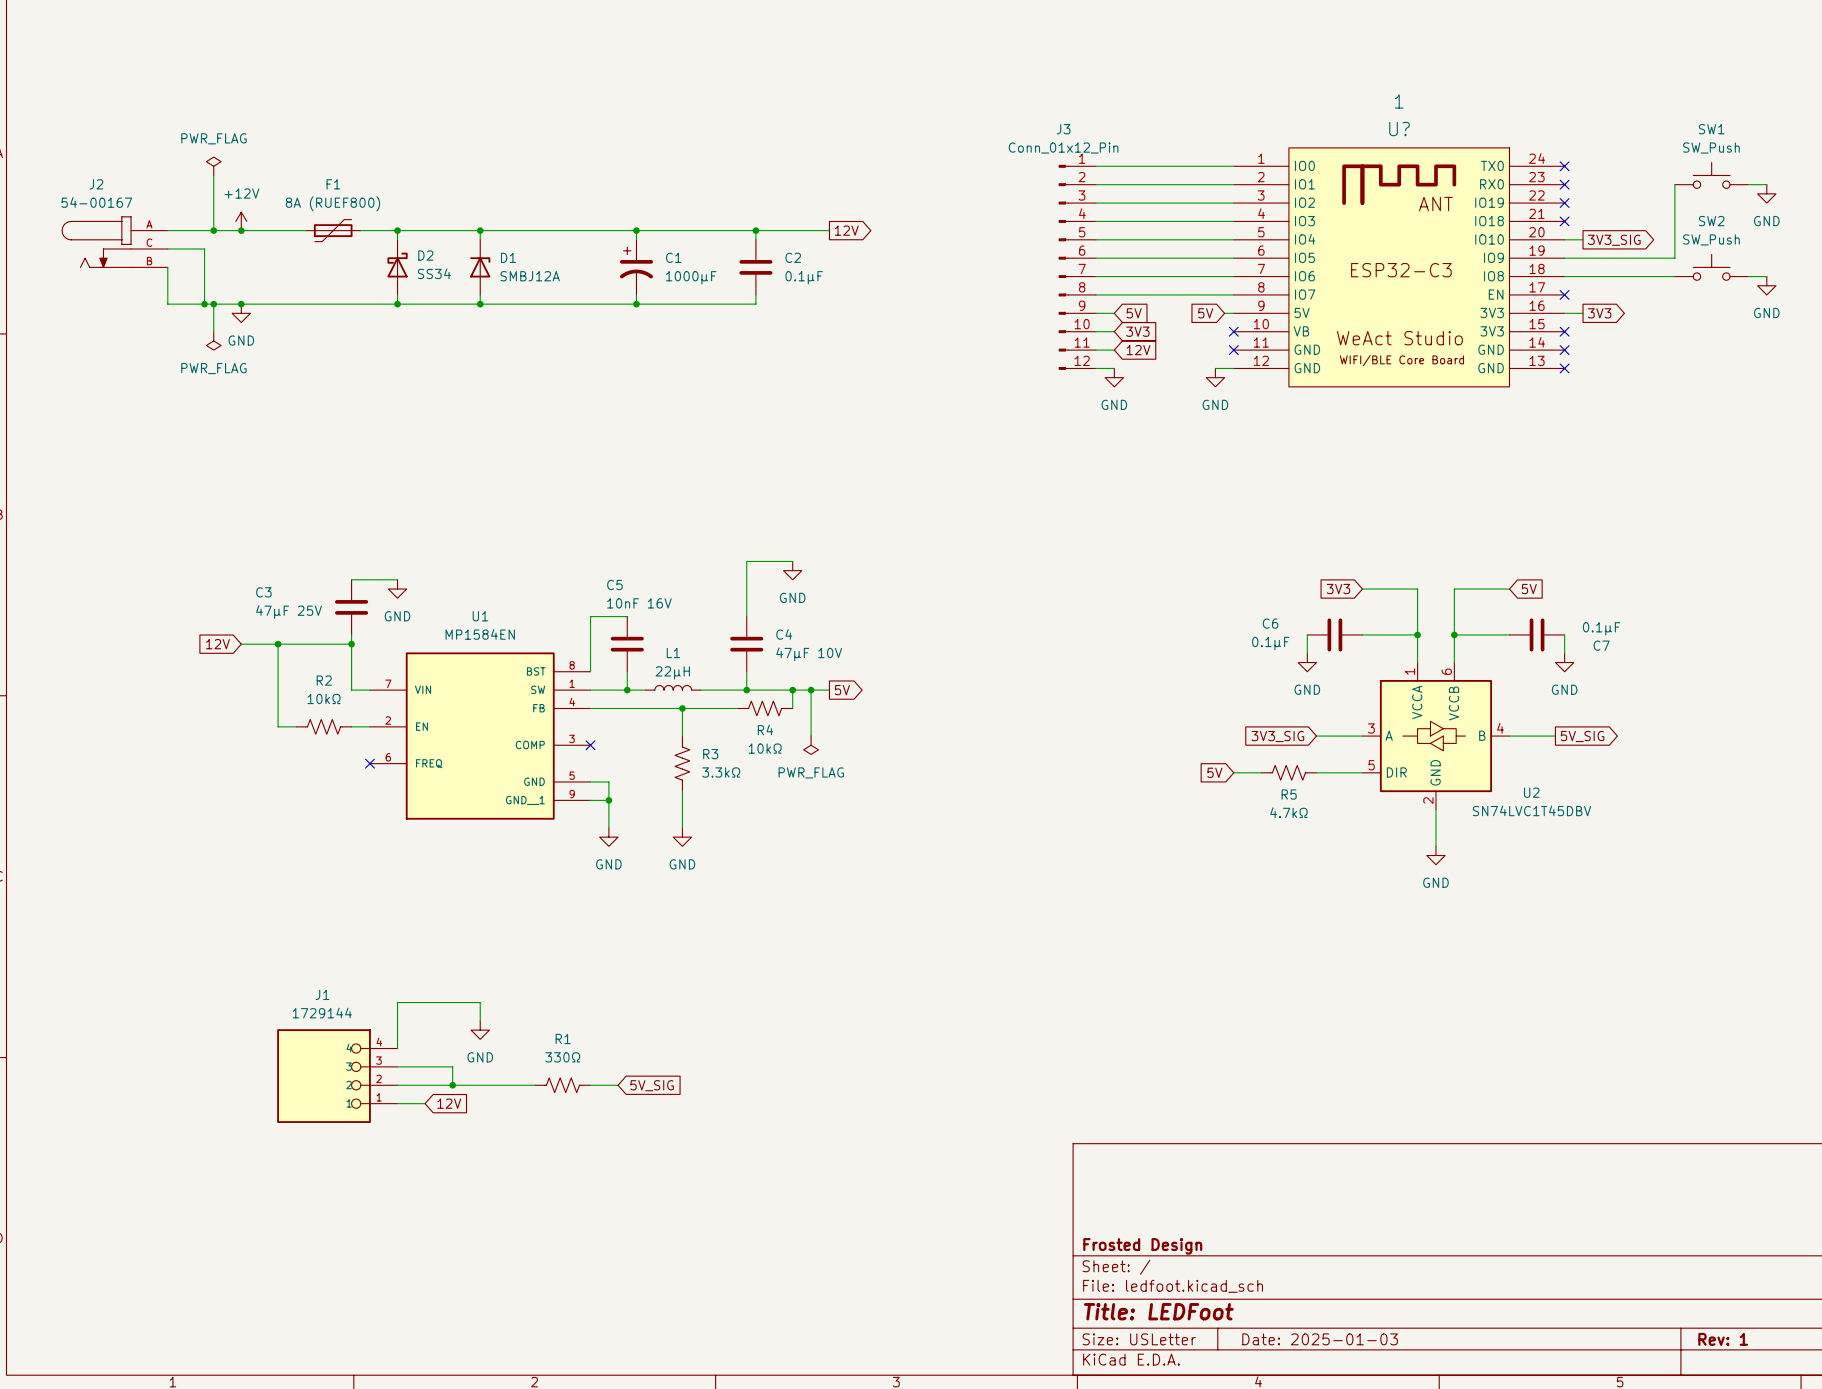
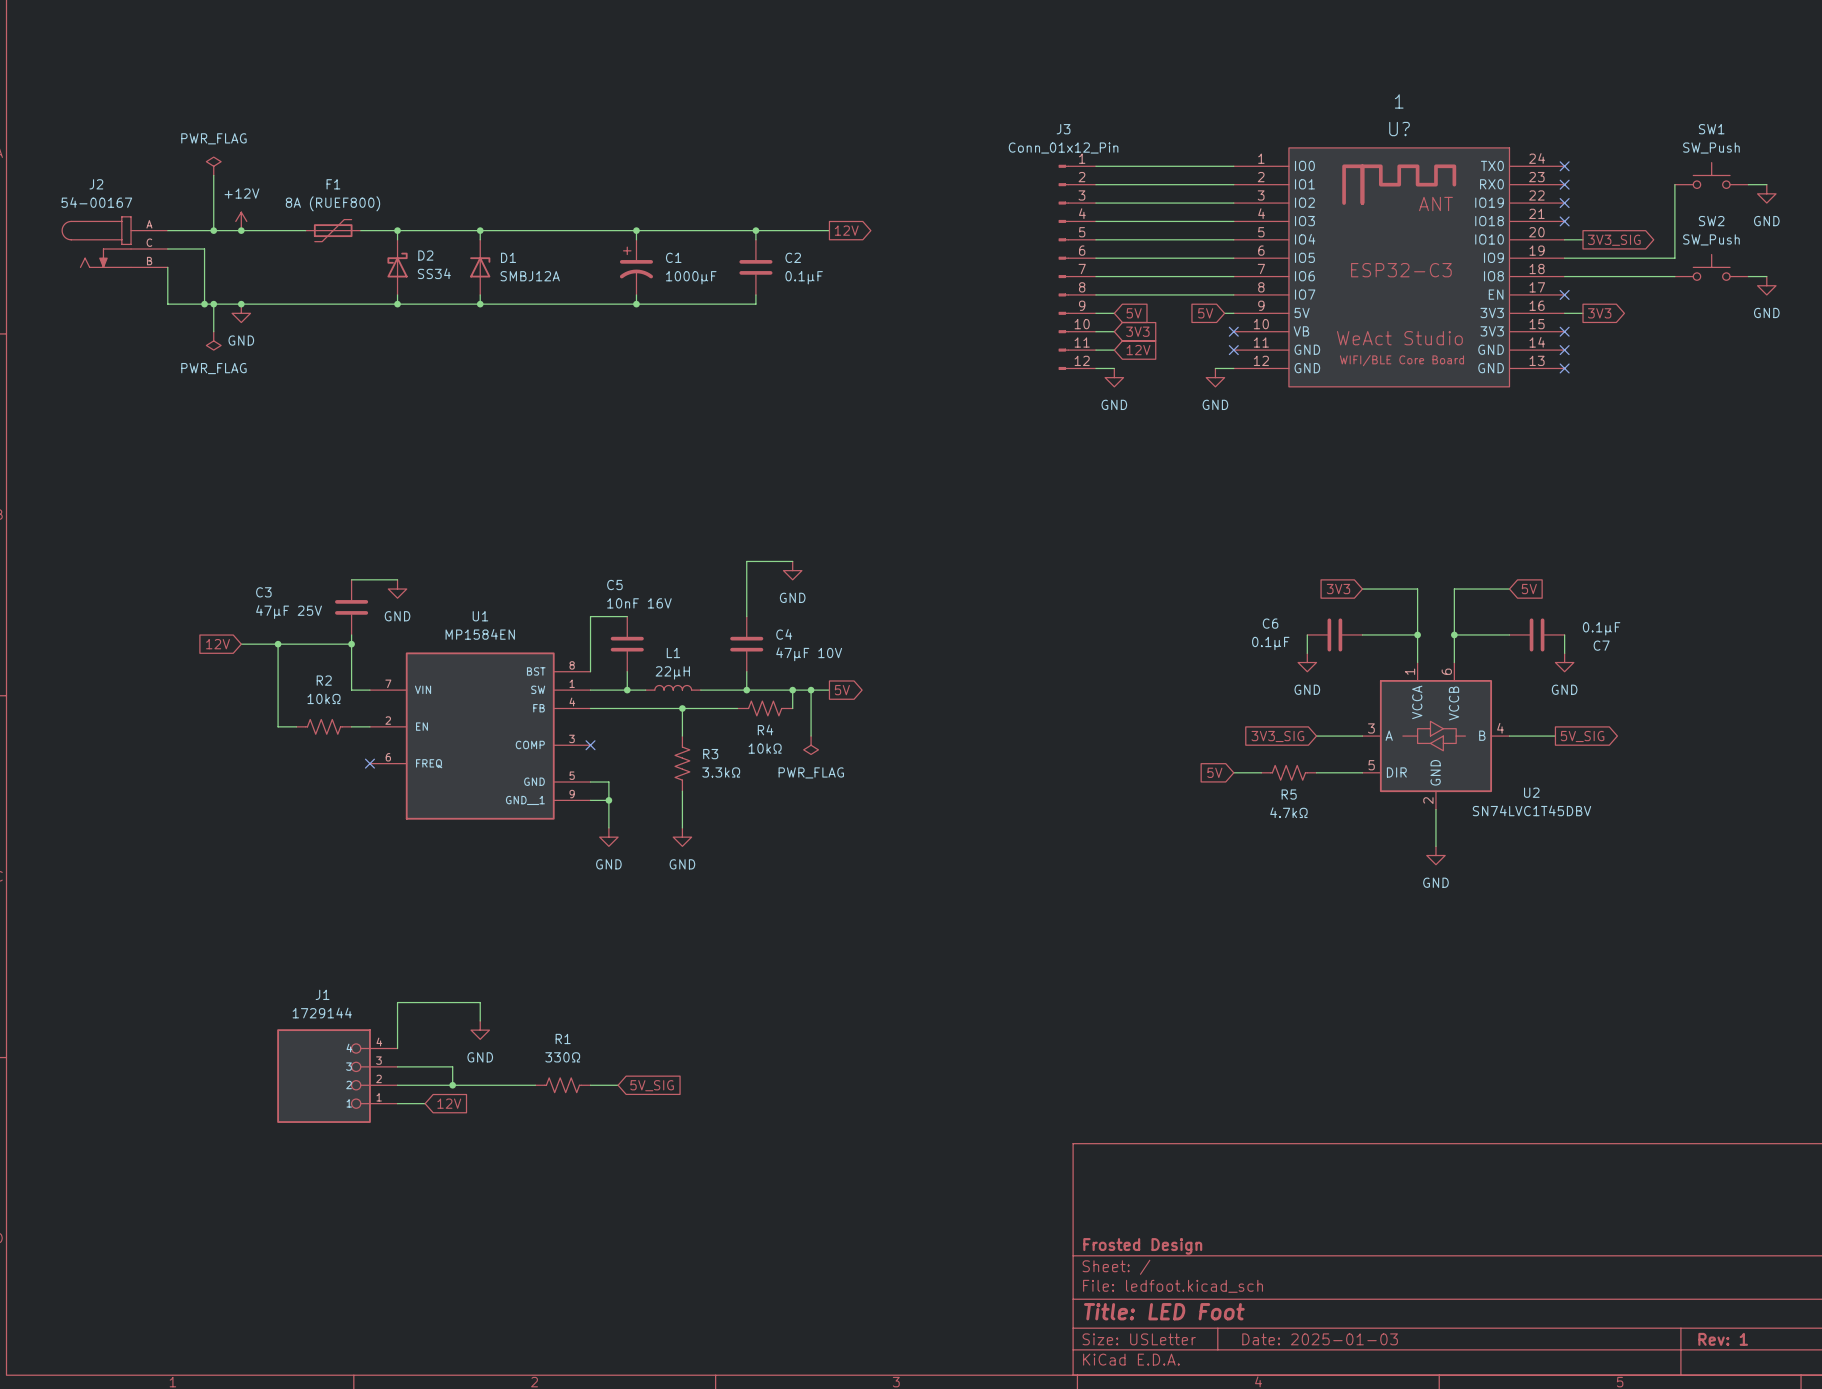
title block: Title: LEDFoot (1158, 1311) -> Title: LED Foot (1164, 1311)

